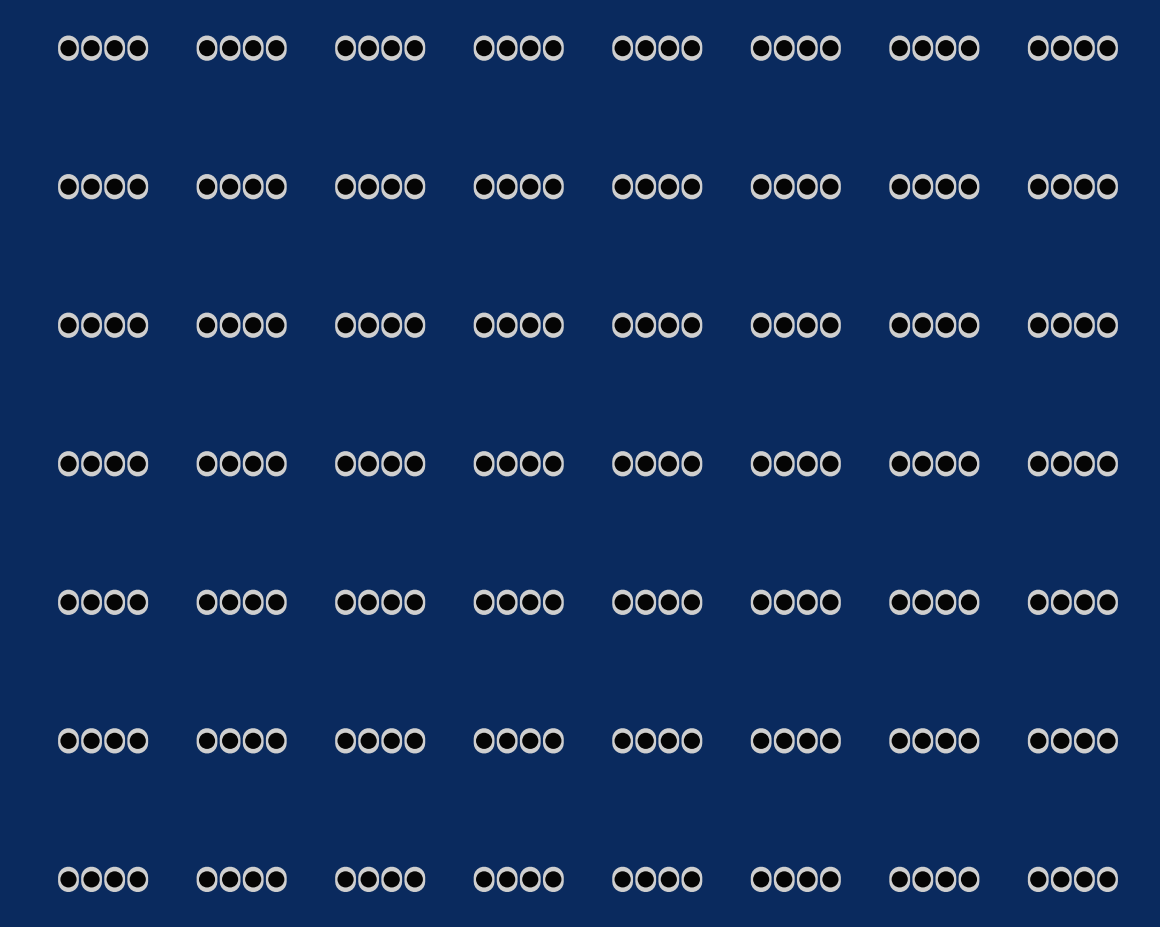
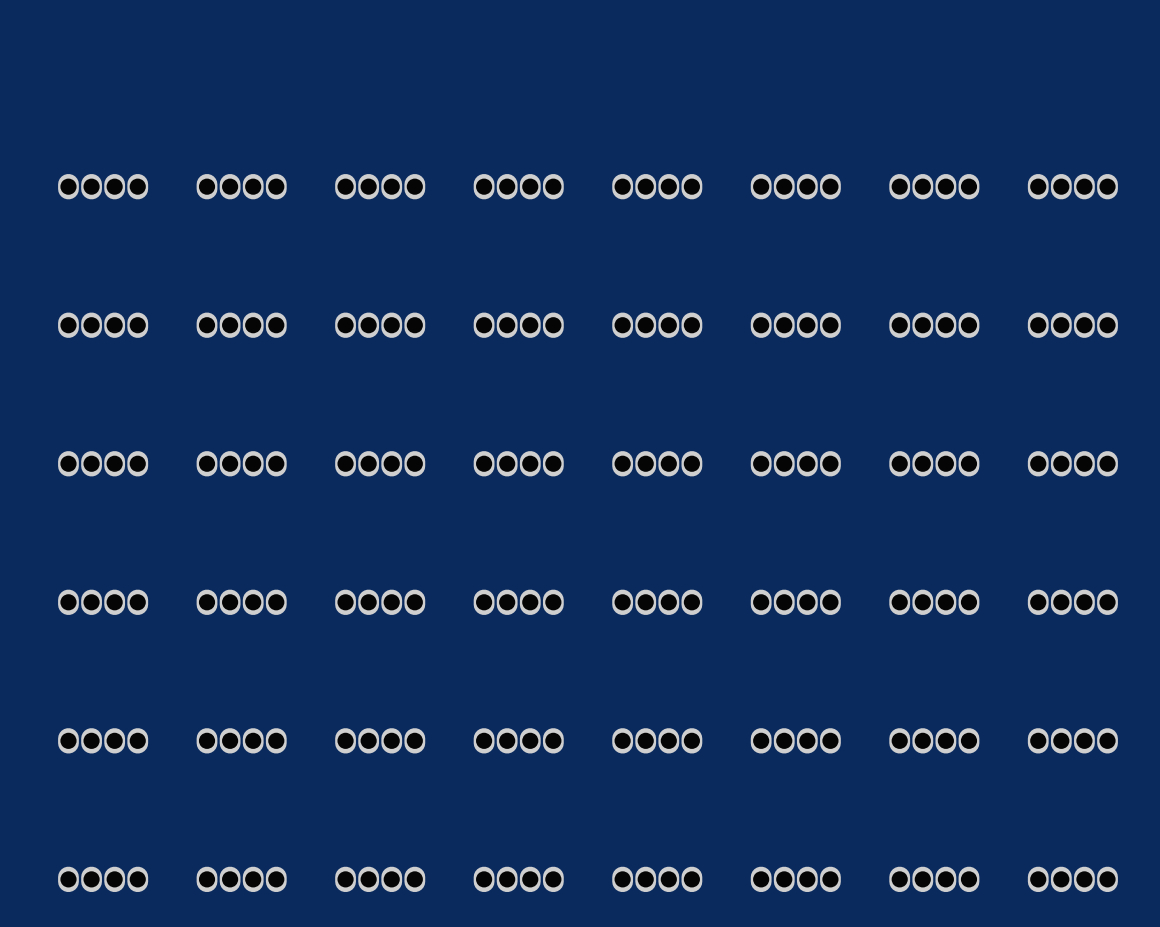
part: (103, 48) -> none
part: (241, 48) -> none
part: (380, 48) -> none
part: (518, 48) -> none
part: (657, 48) -> none
part: (795, 48) -> none
part: (934, 48) -> none
part: (1072, 48) -> none

